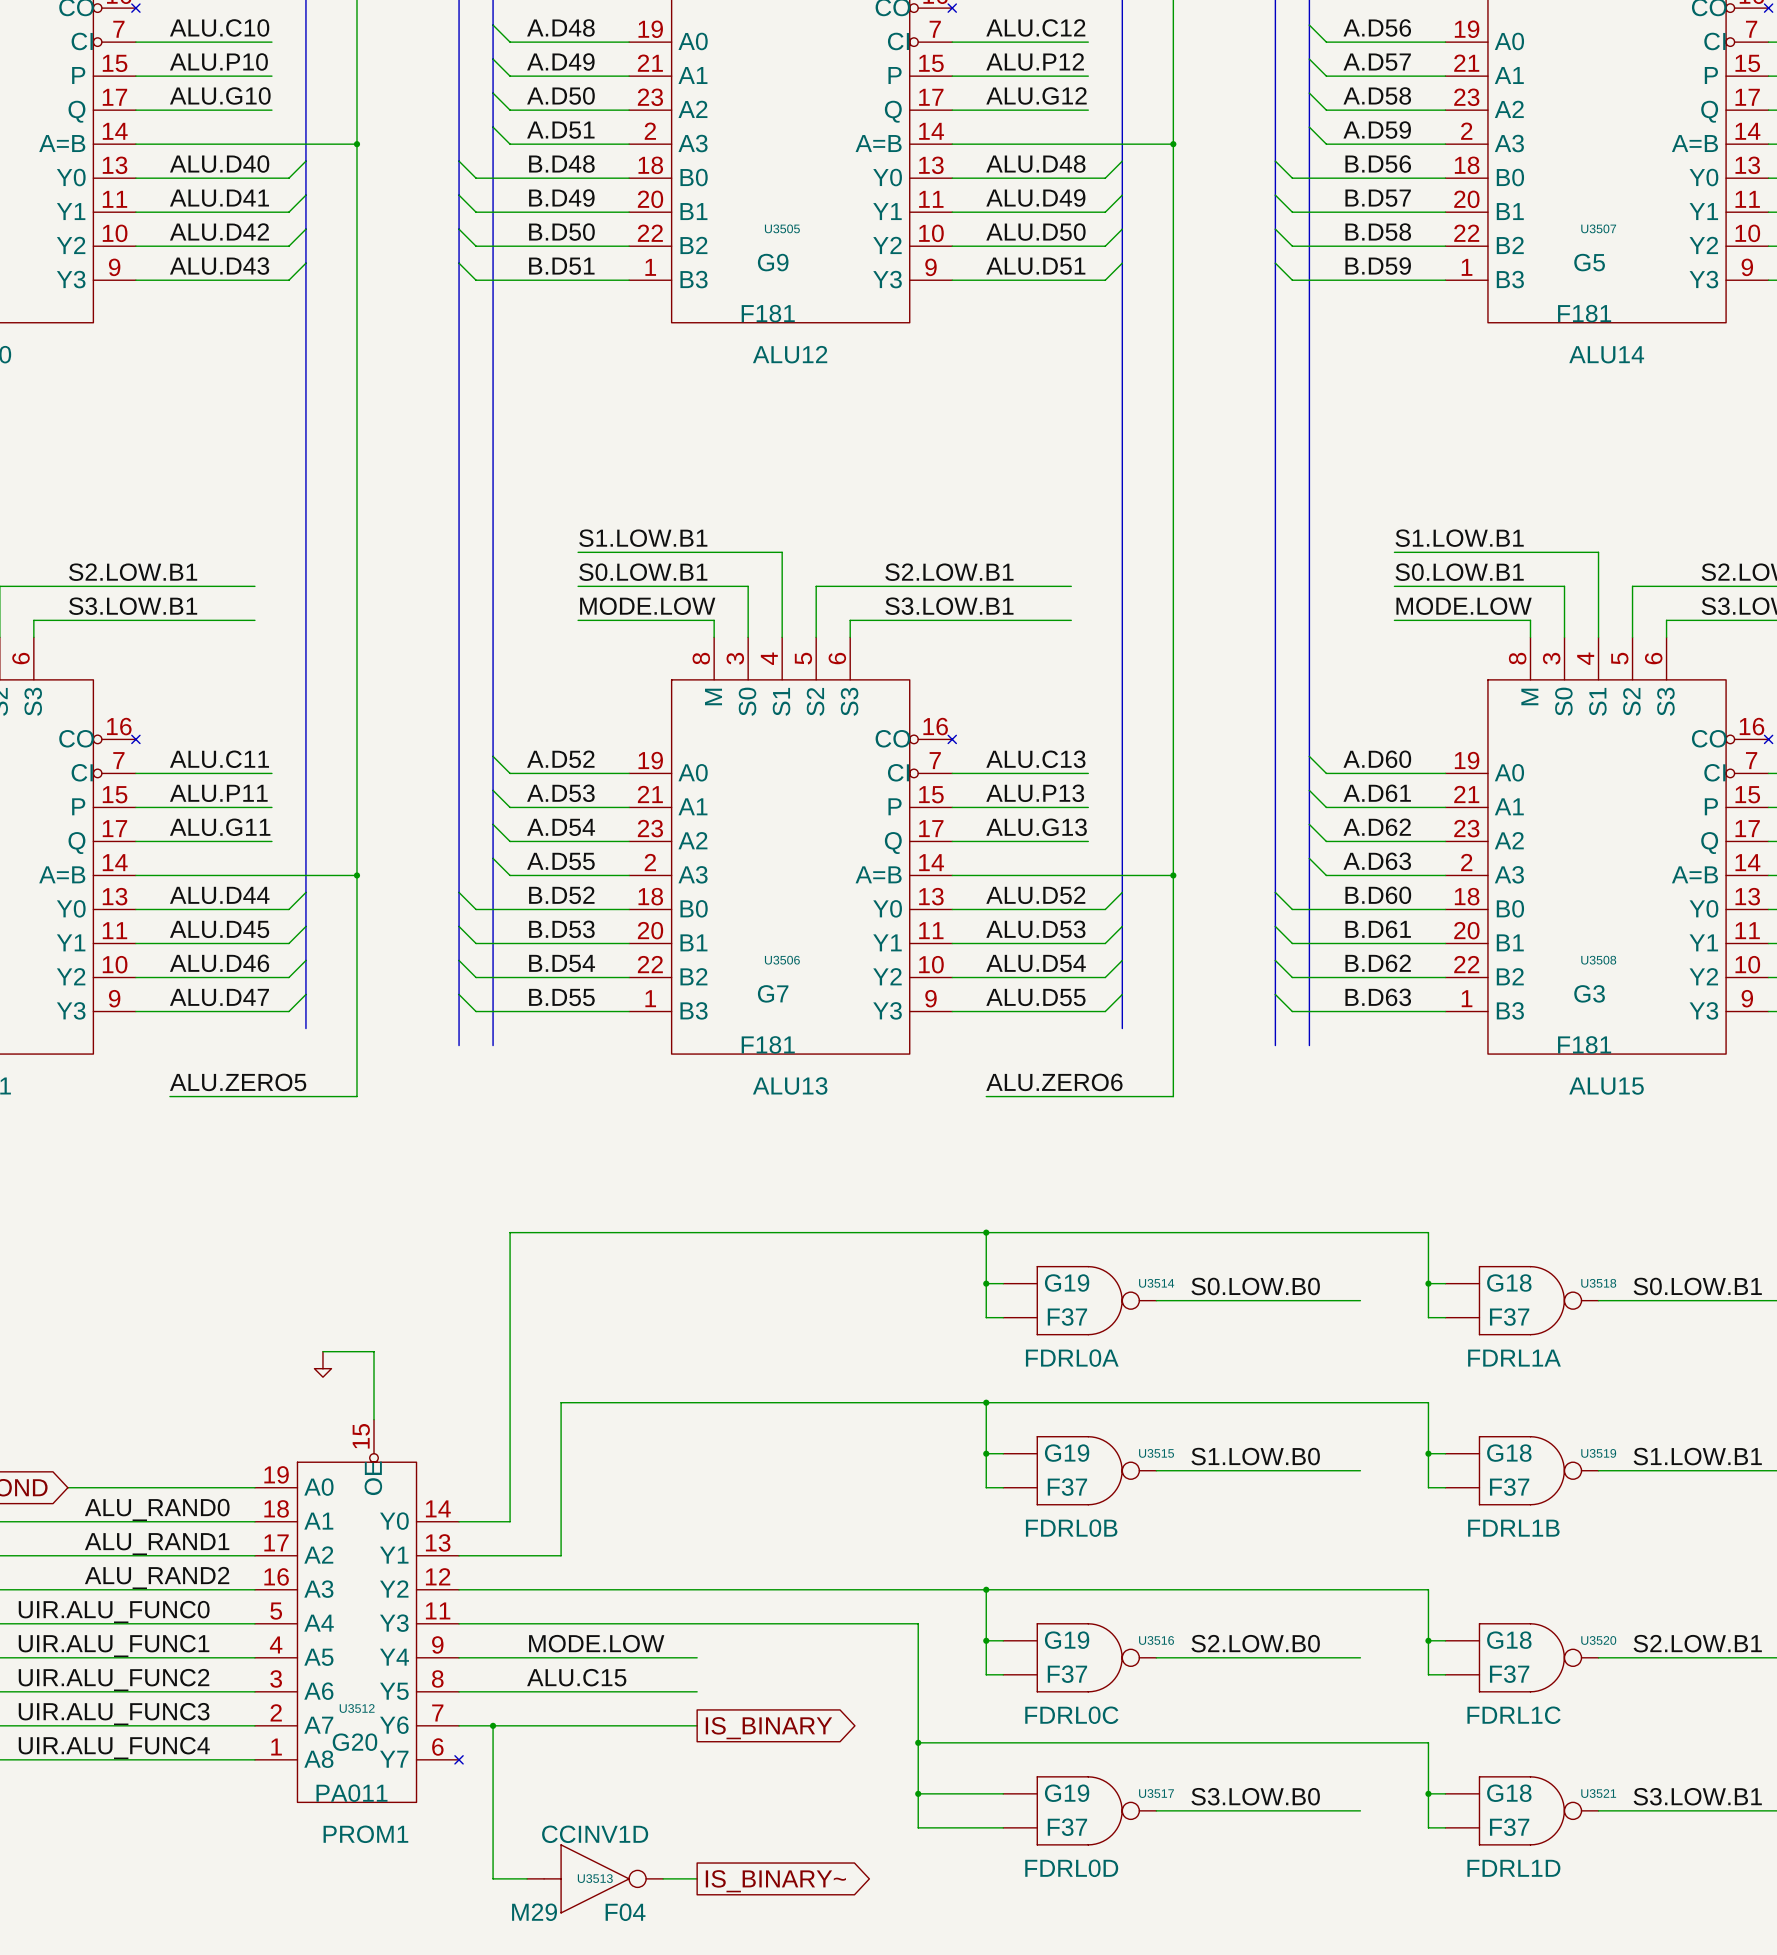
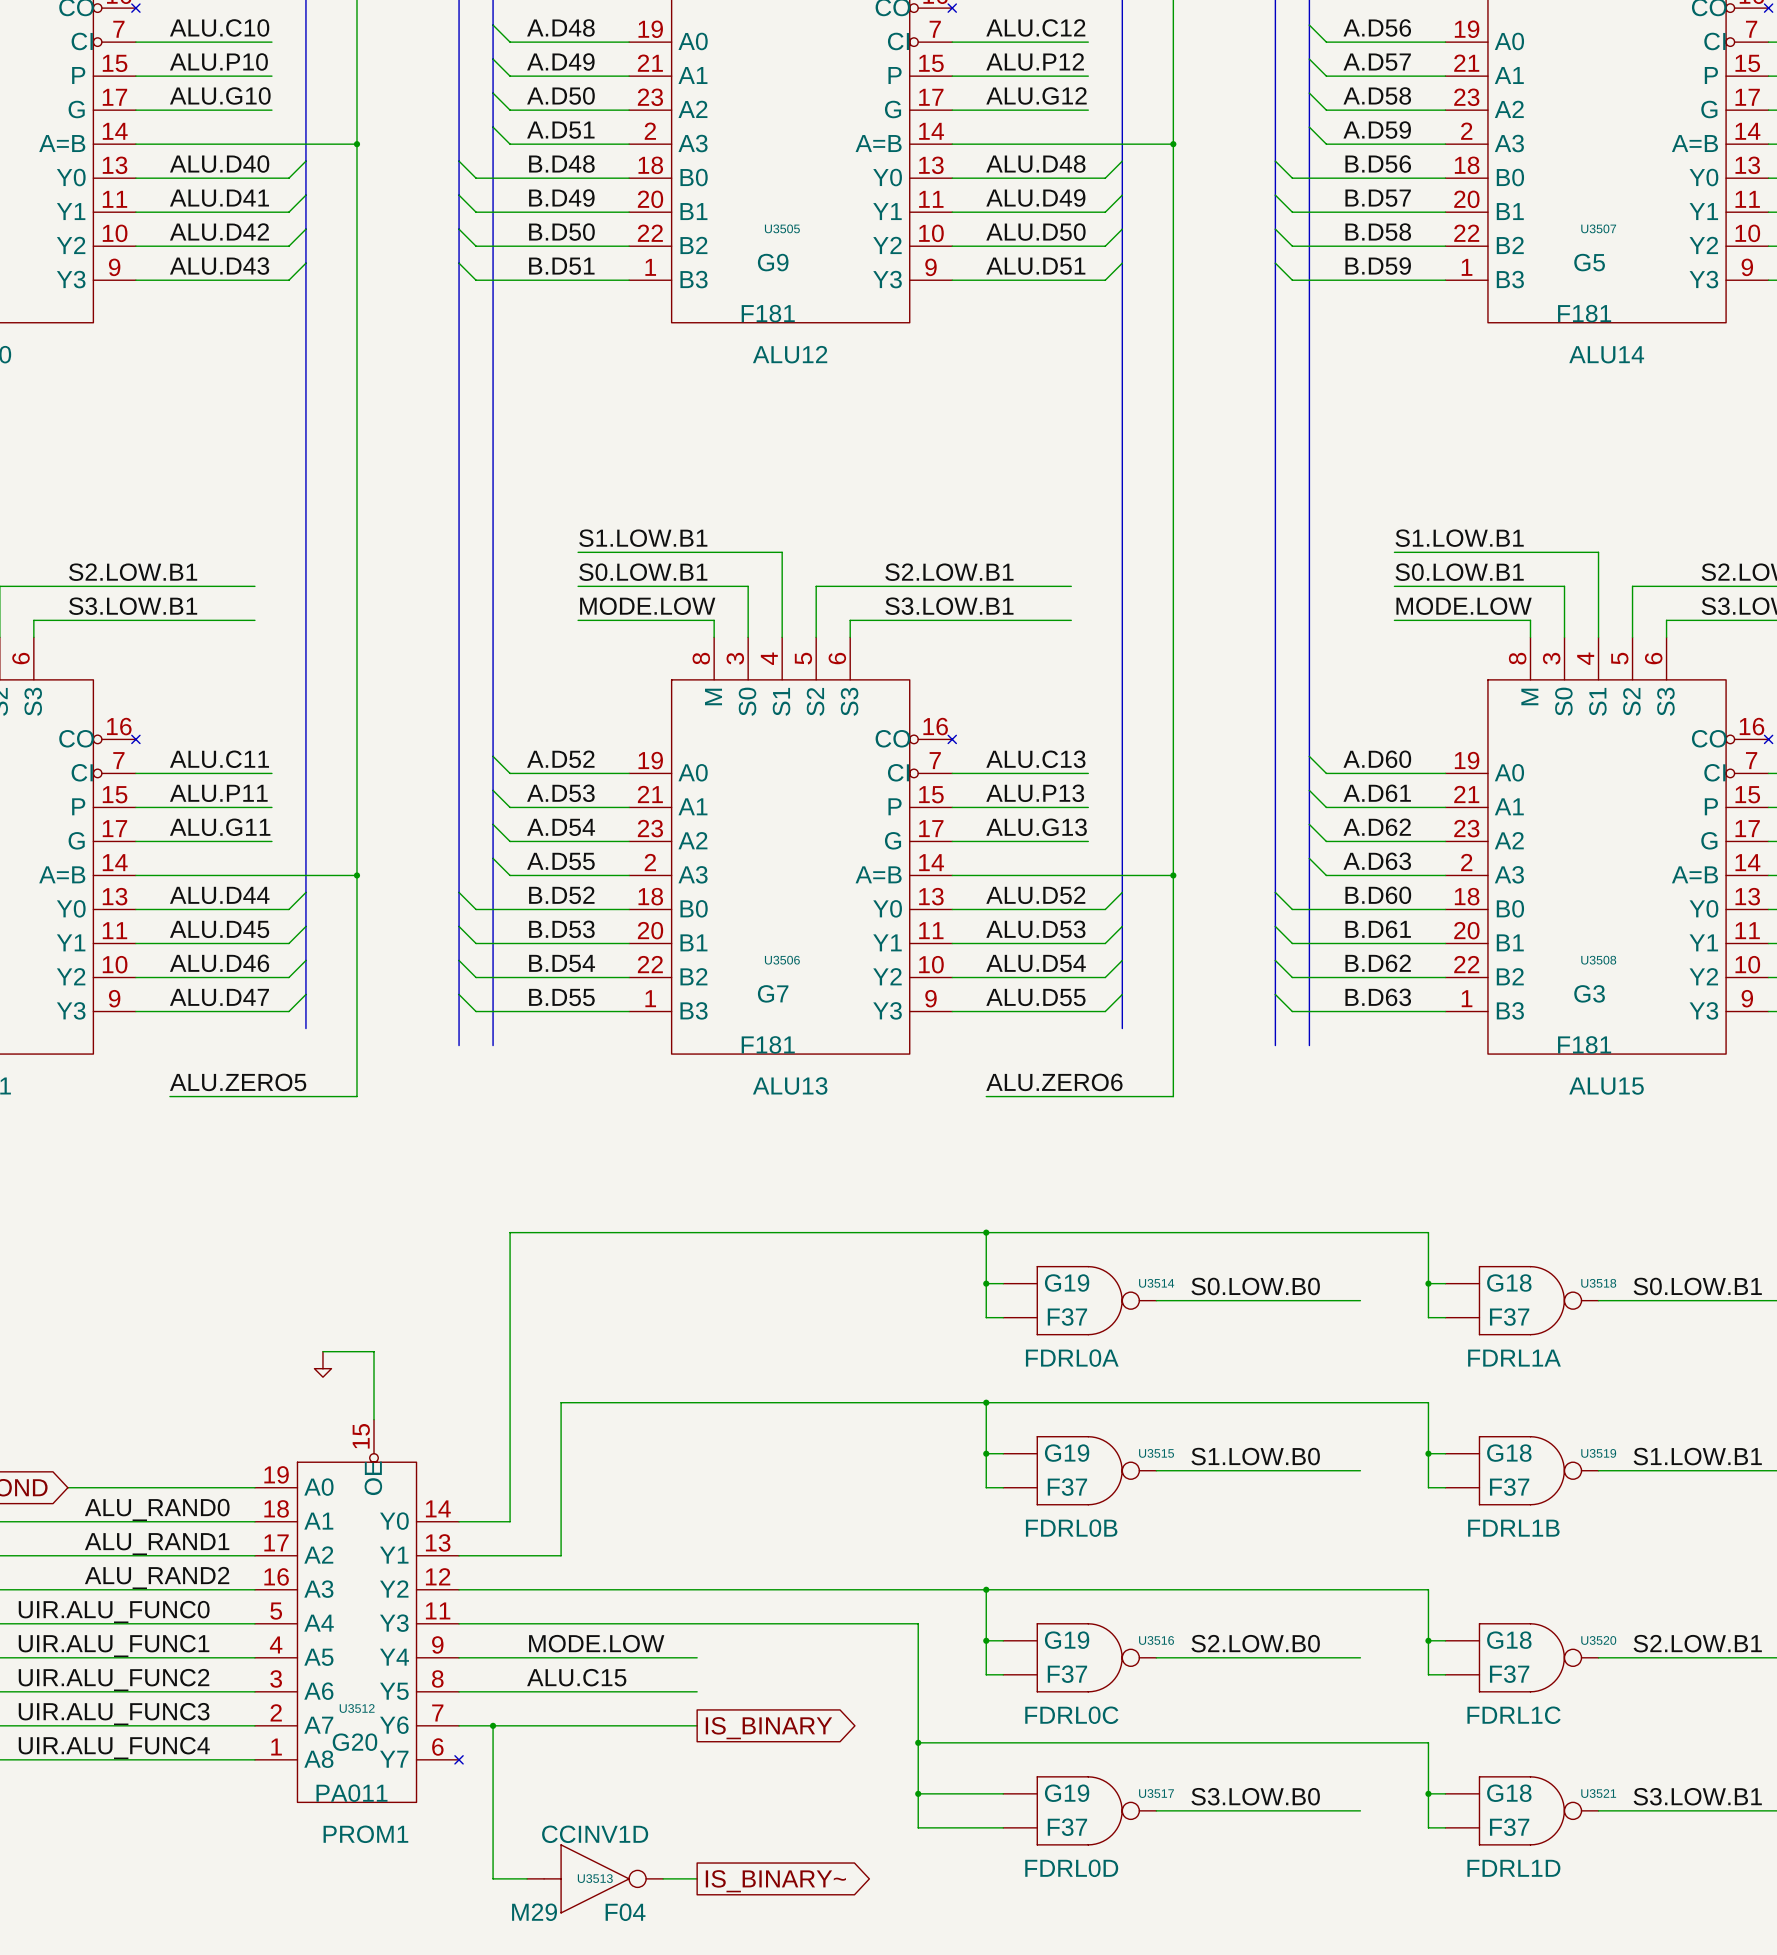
part pin name: Q (76, 111) -> G (76, 109)
U3505 pin name: Q (893, 111) -> G (893, 109)
U3507 pin name: Q (1709, 111) -> G (1709, 109)
part pin name: Q (76, 843) -> G (76, 840)
U3506 pin name: Q (893, 843) -> G (893, 840)
U3508 pin name: Q (1709, 843) -> G (1709, 840)

